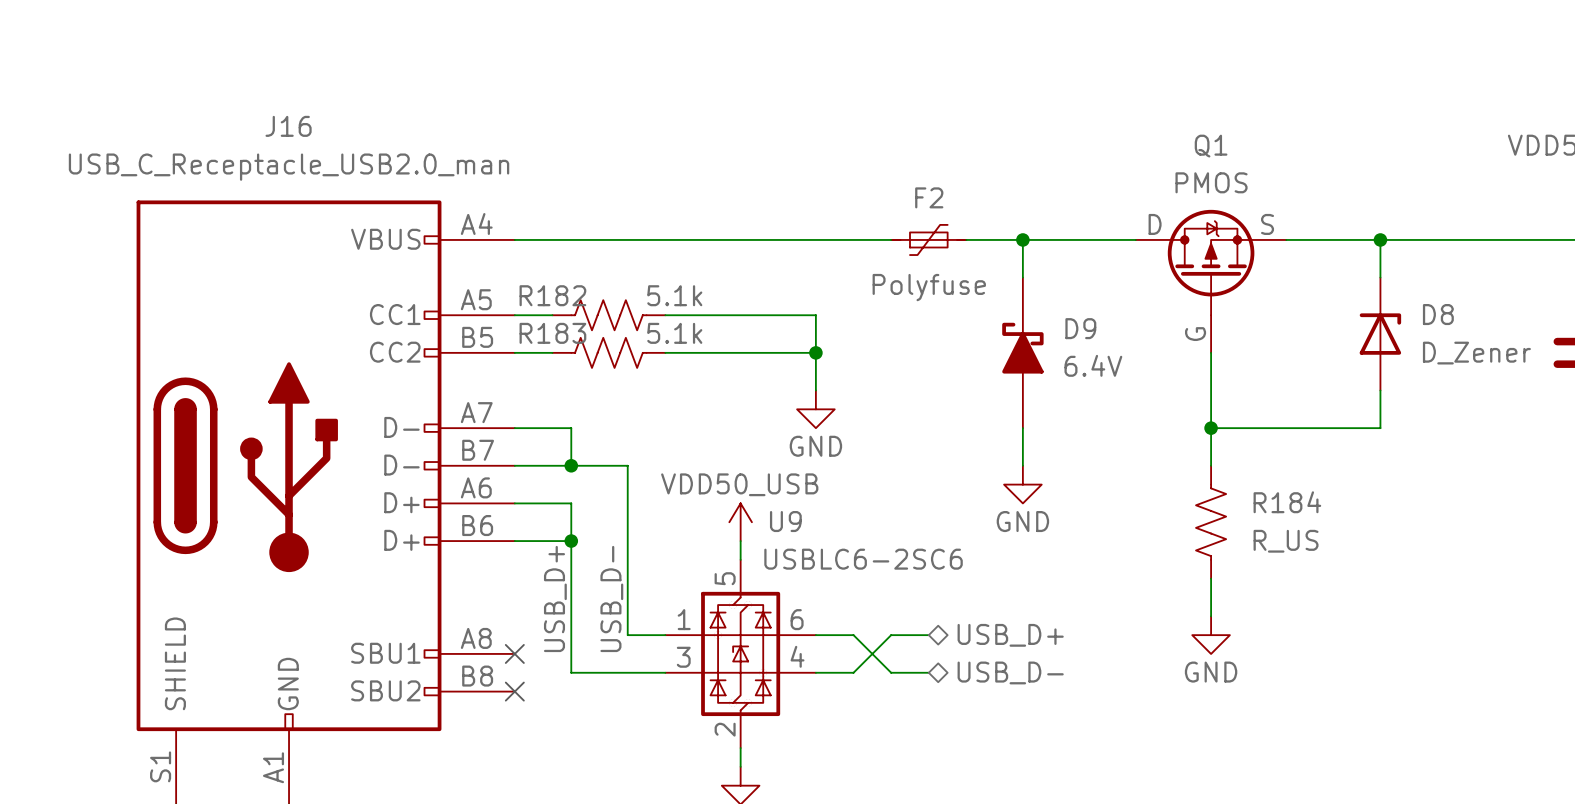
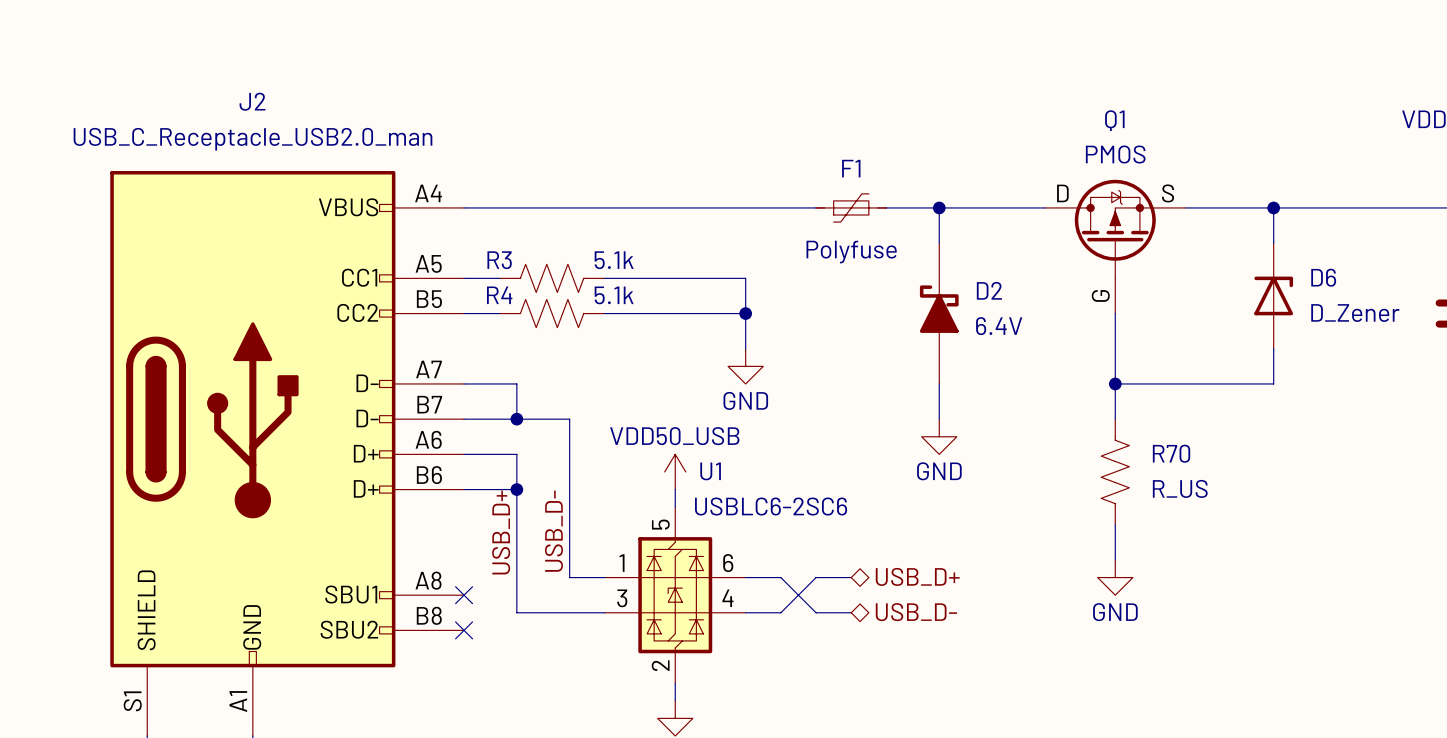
J16 name: J16 (288, 126) -> J2 (252, 101)
F2 name: F2 (929, 197) -> F1 (851, 168)
R182 name: R182 (552, 295) -> R3 (499, 260)
D8 name: D8 (1438, 314) -> D6 (1323, 277)
D9 name: D9 (1080, 328) -> D2 (989, 290)
R183 name: R183 (552, 333) -> R4 (499, 295)
R184 name: R184 (1287, 502) -> R70 (1171, 453)
U9 name: U9 (785, 521) -> U1 (710, 471)

